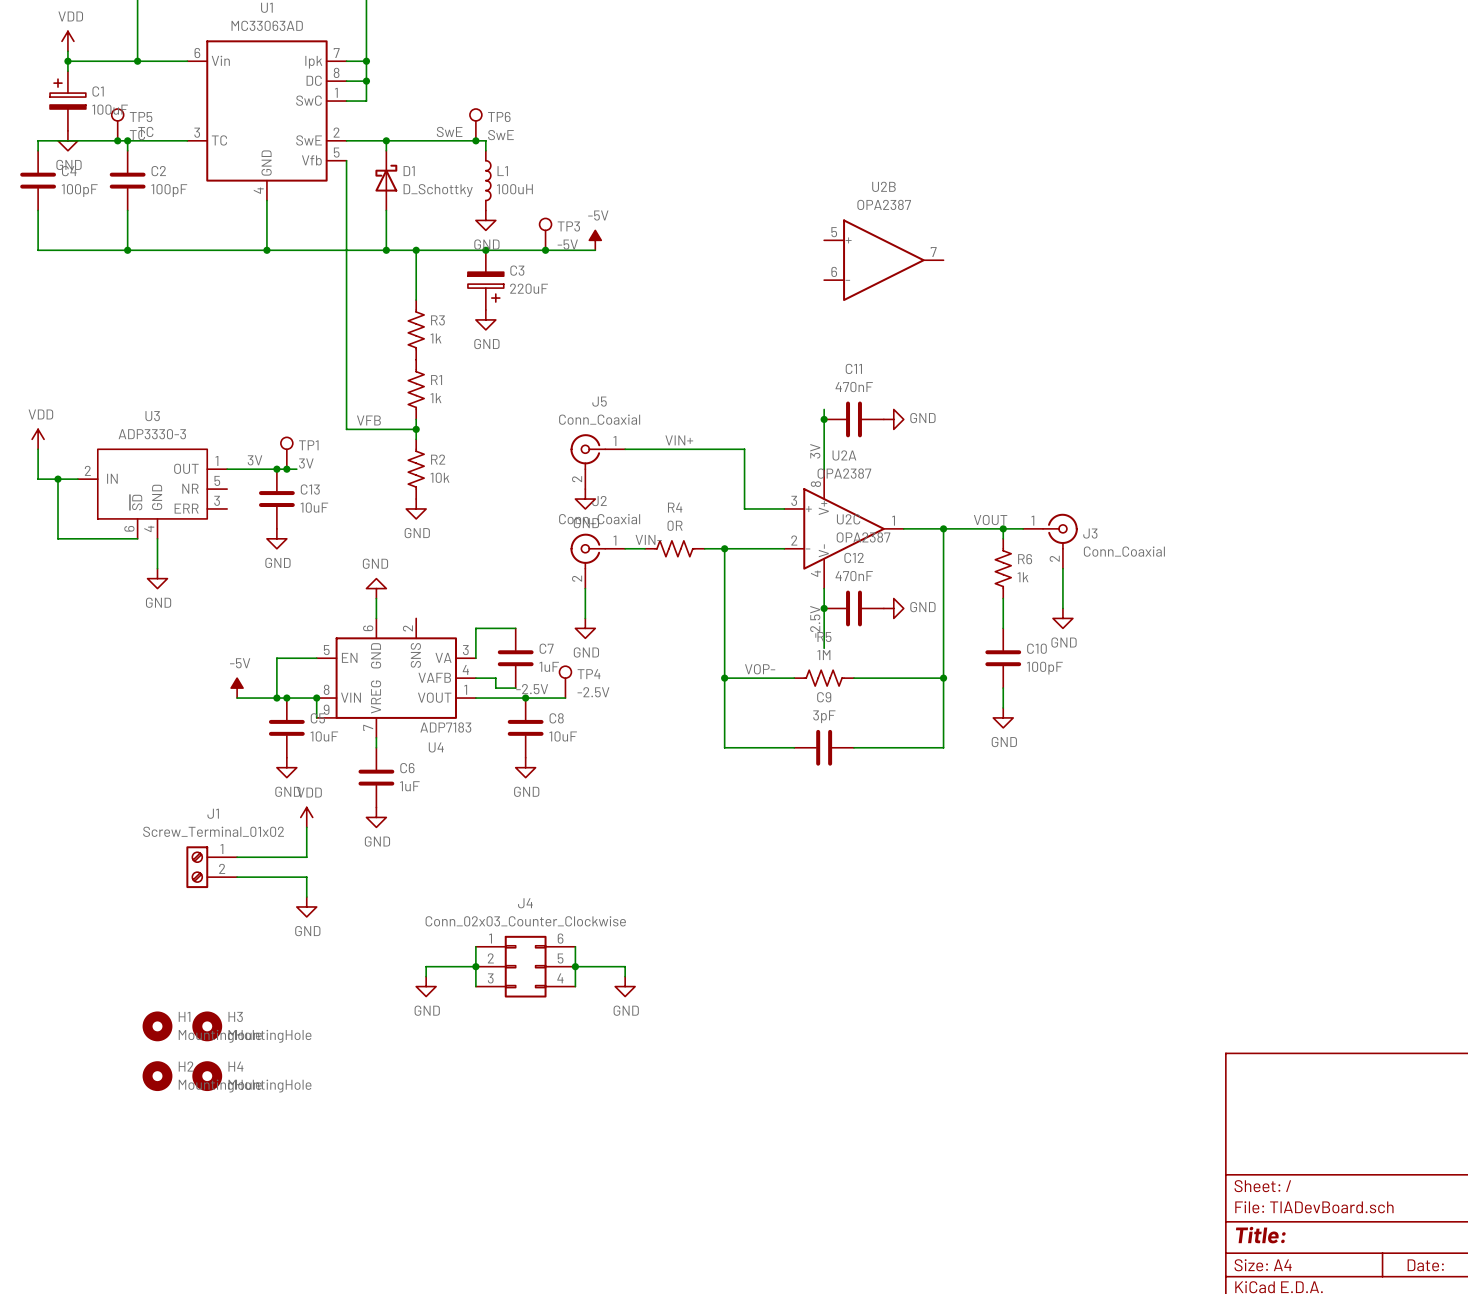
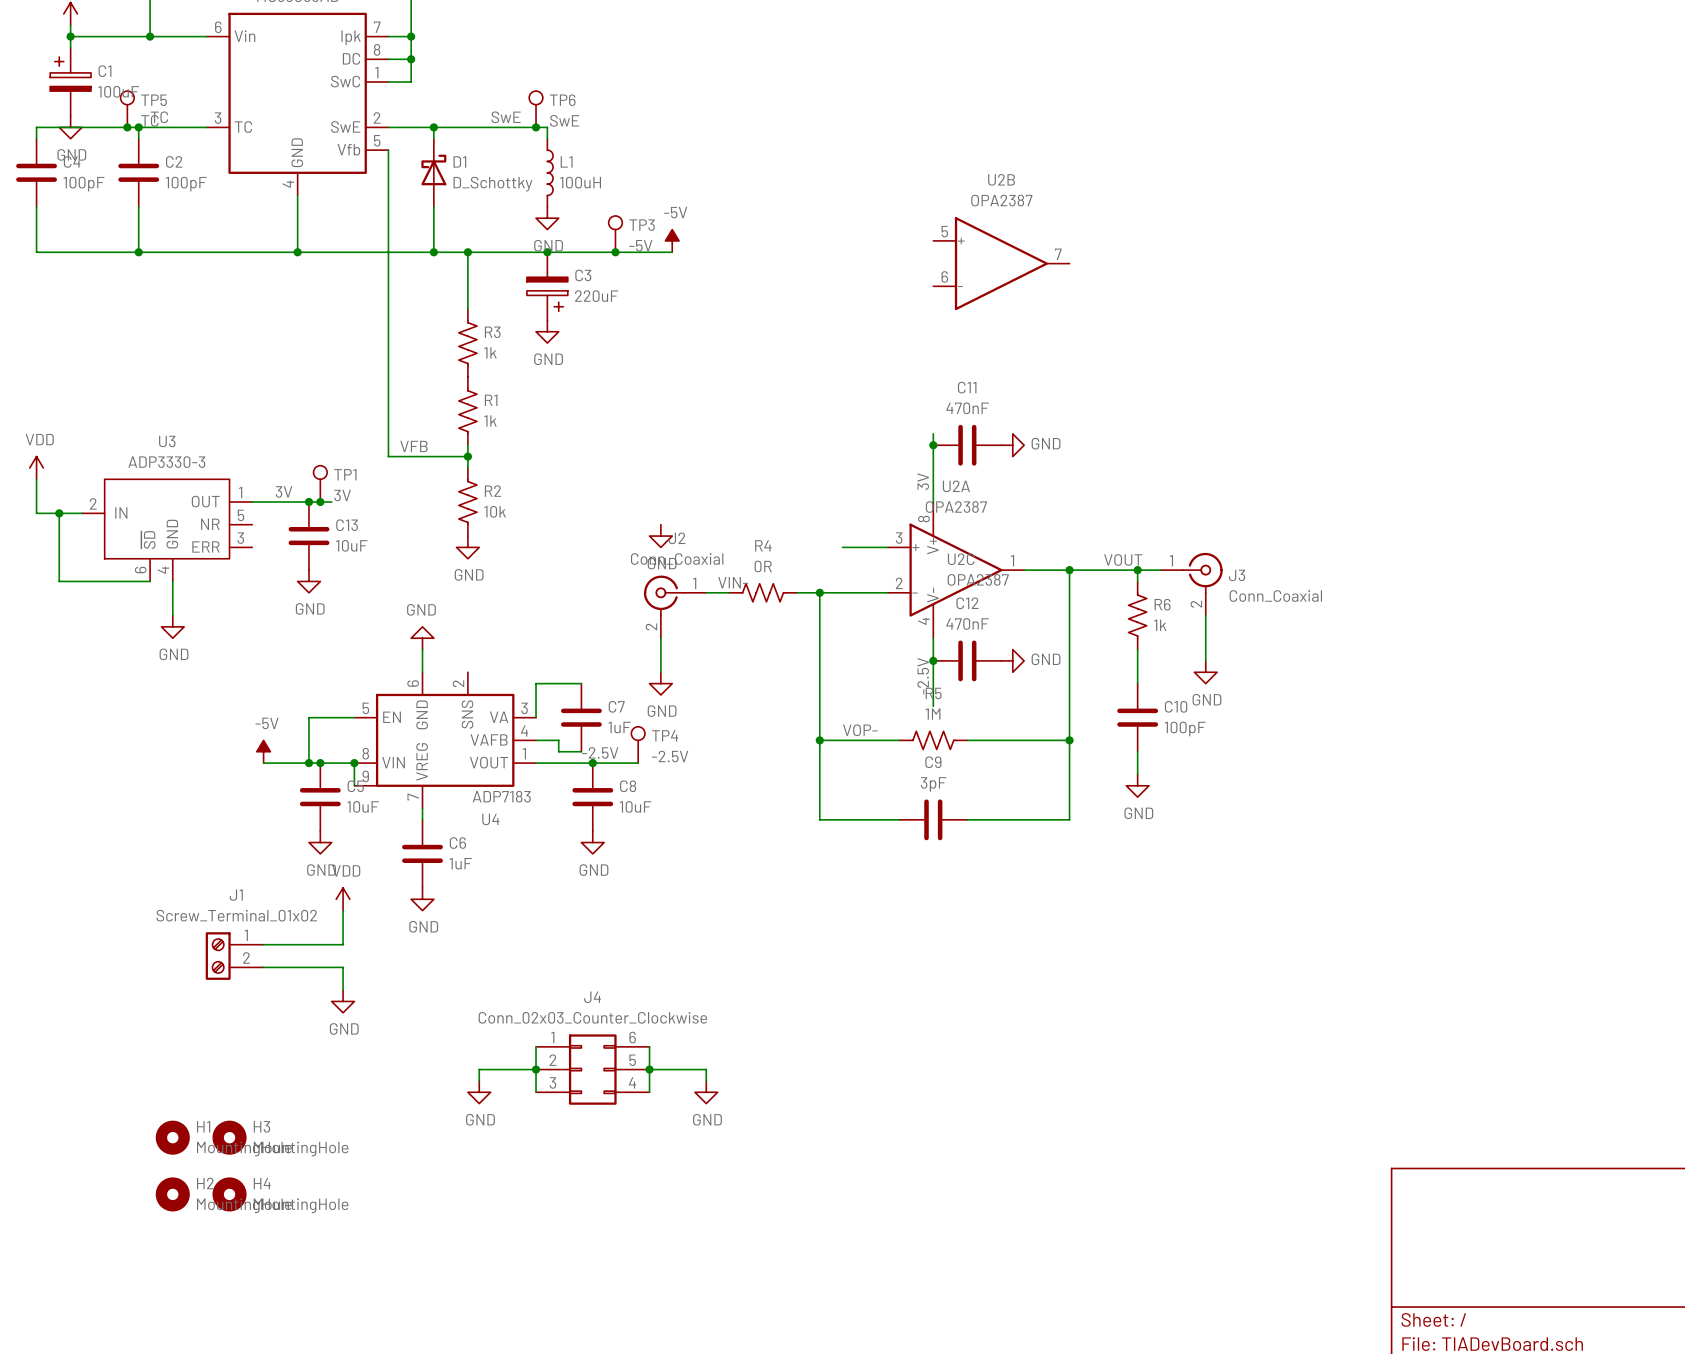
label: VIN+ (679, 440) -> none
wire: (625, 449) (744, 449) (744, 508) -> none
J5: Conn_Coaxial (597, 461) -> none

